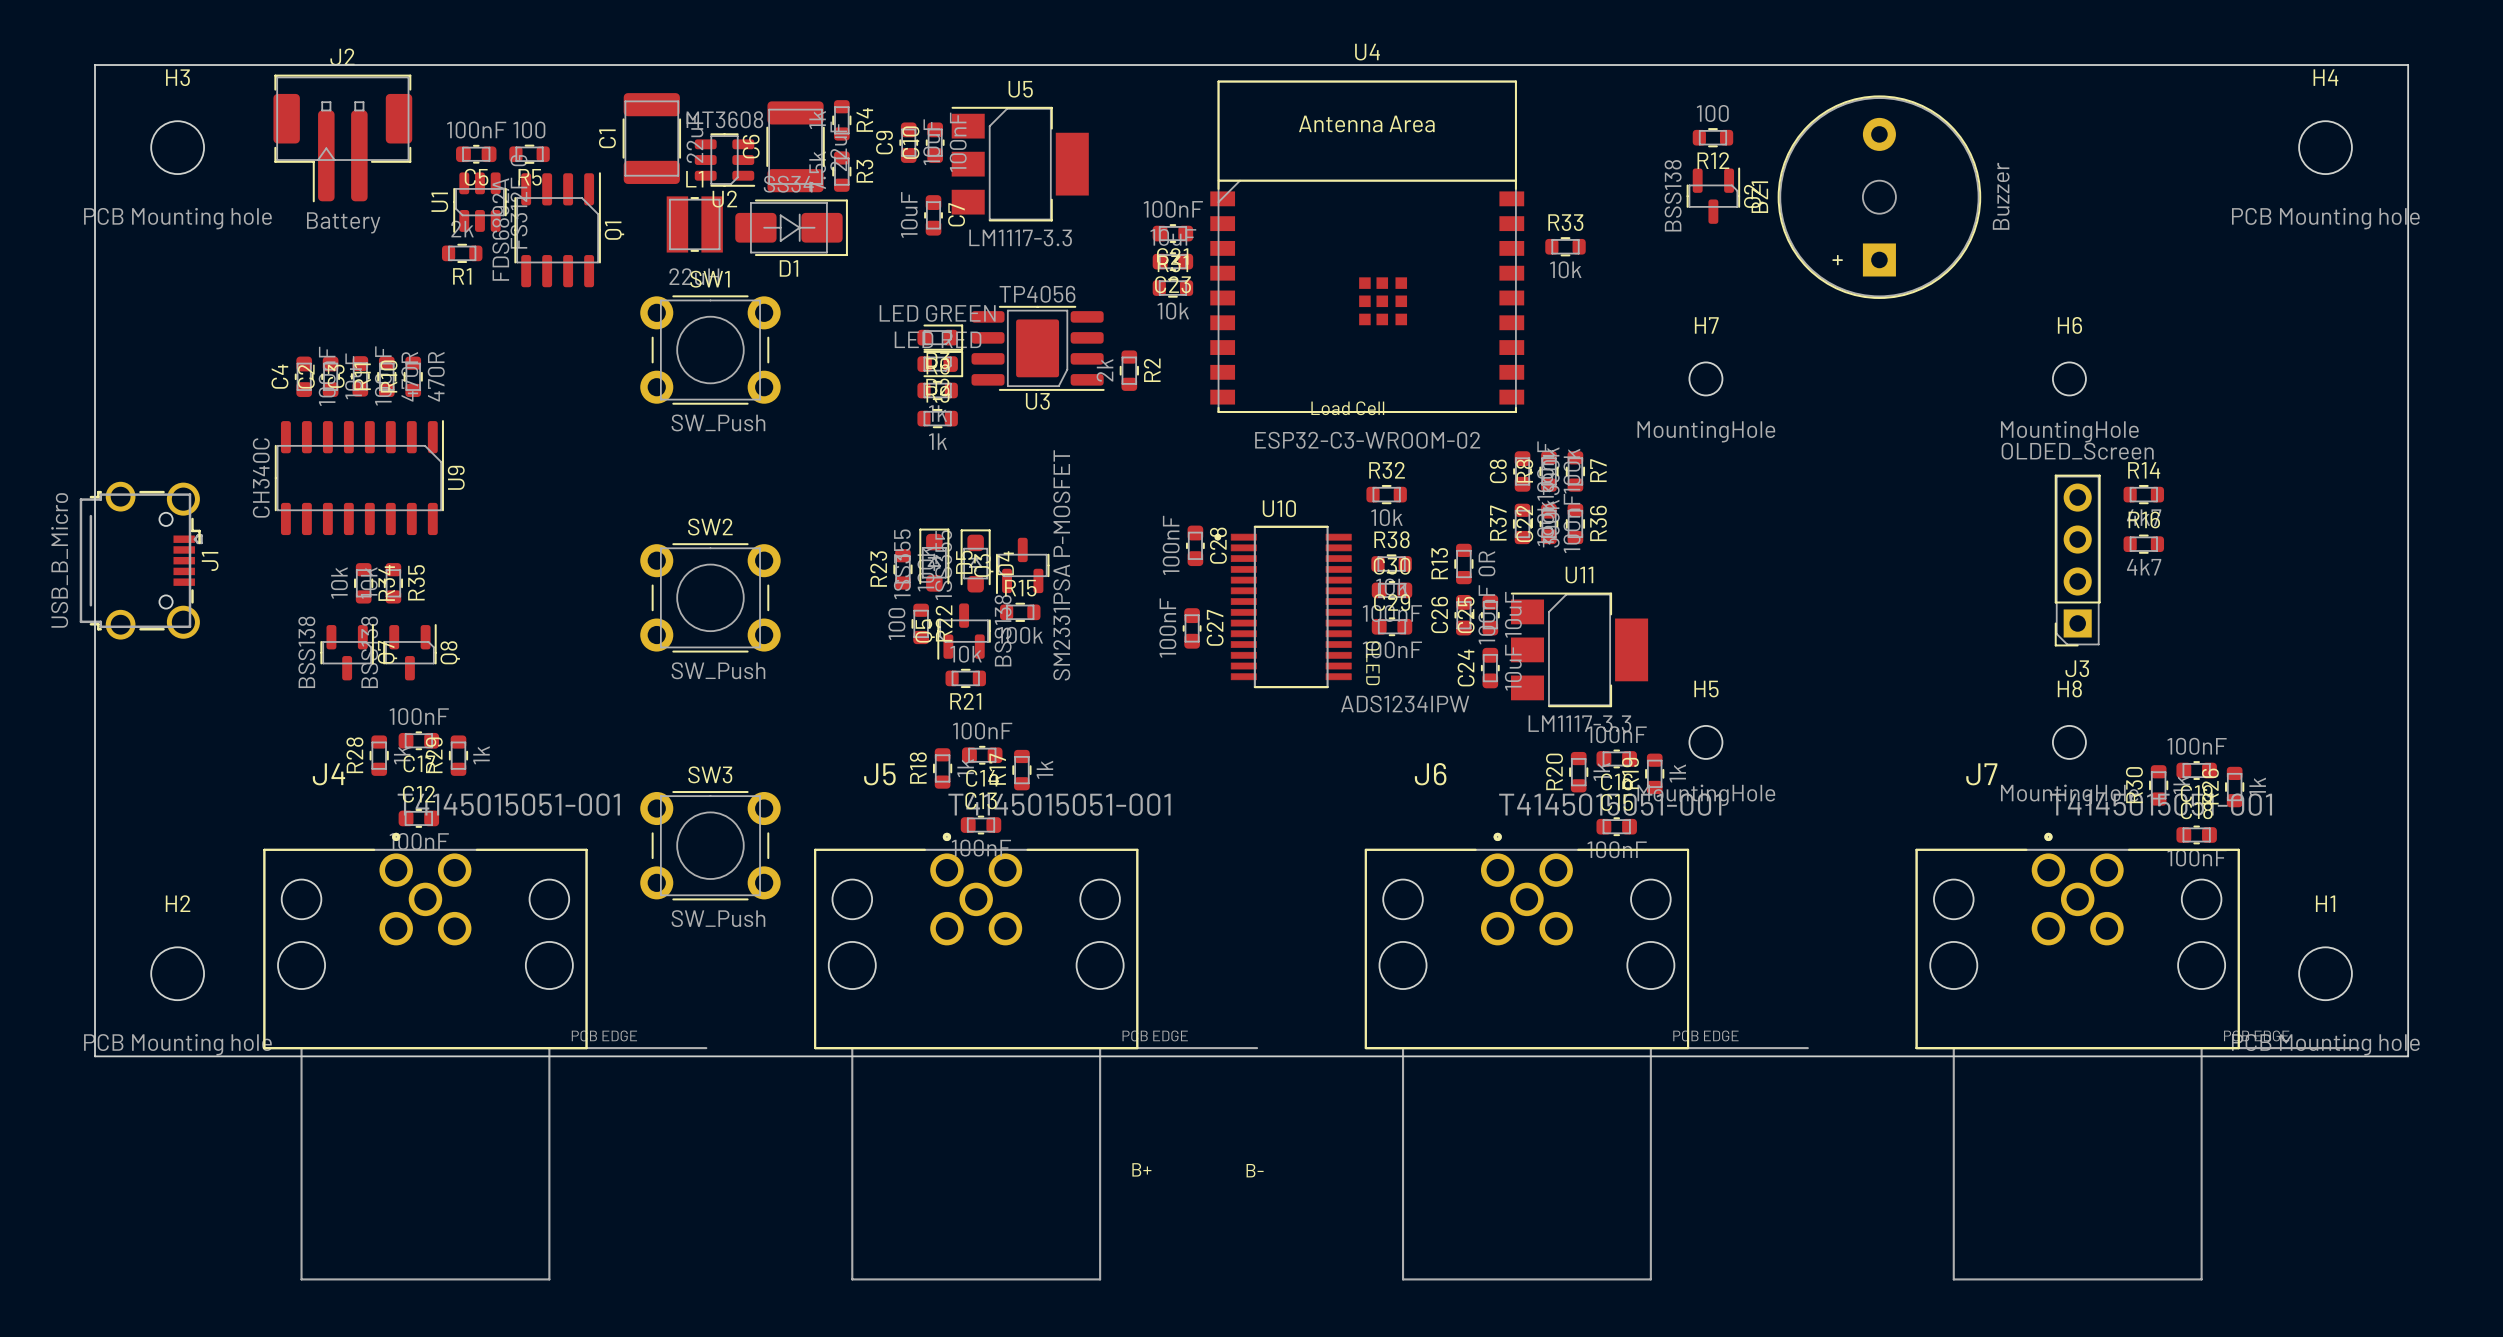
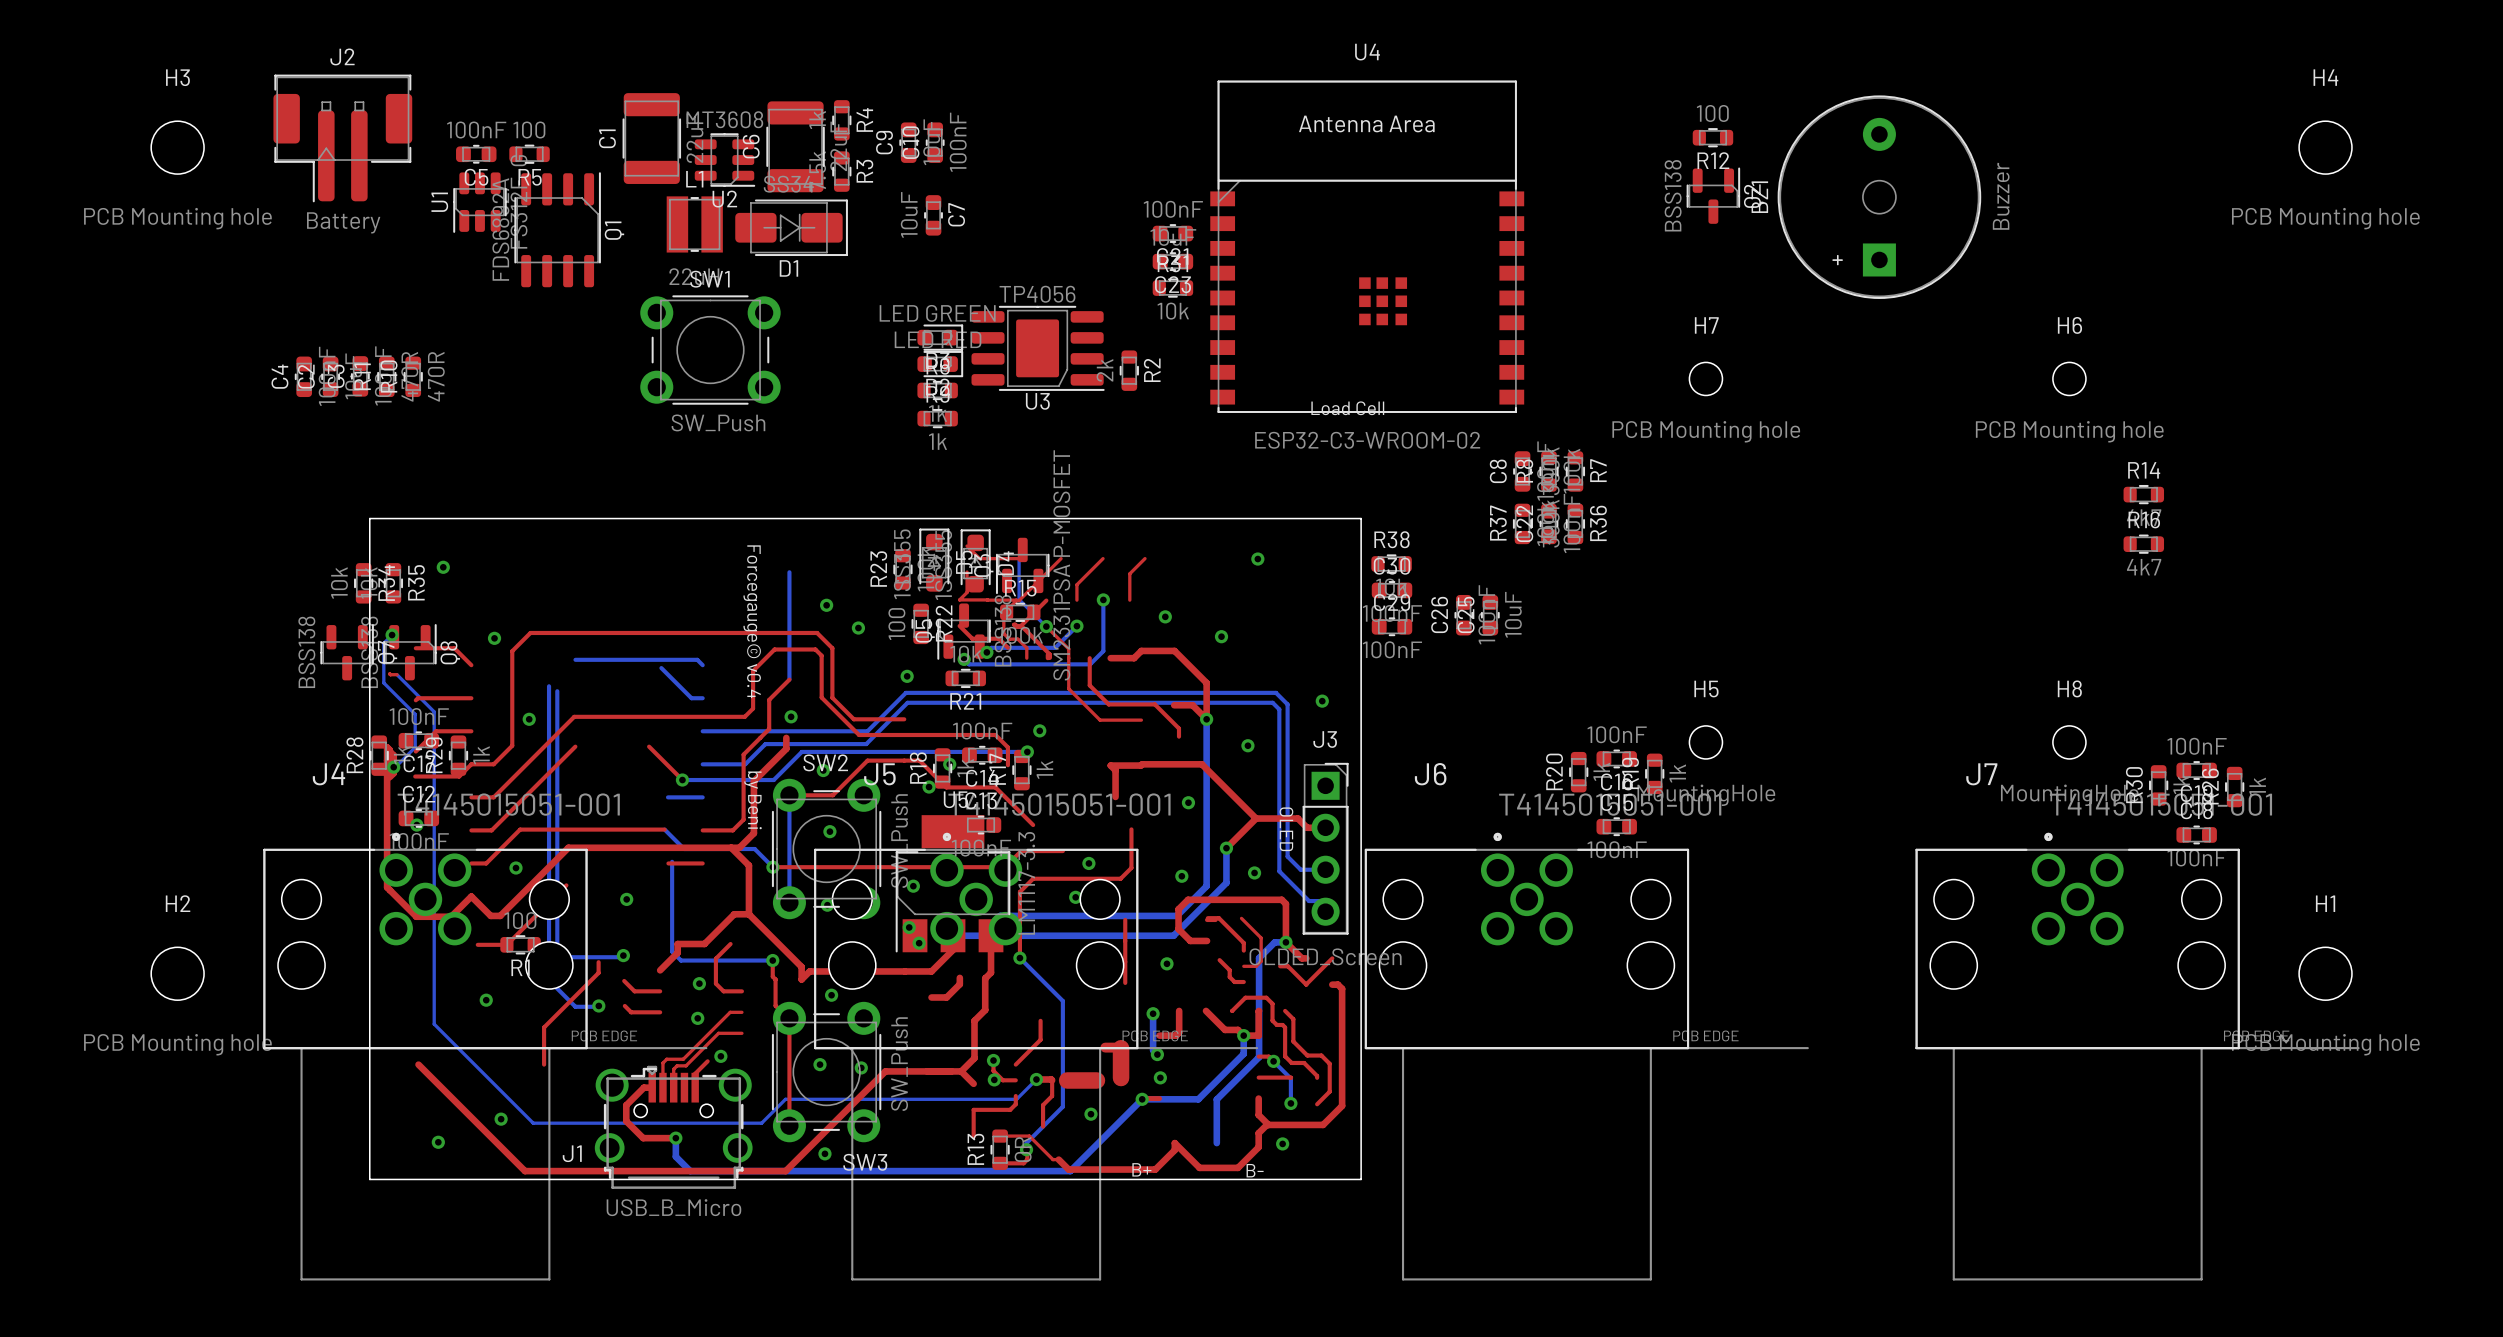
board edge: (95, 65) (2408, 65) (2408, 1056) (95, 1056) (95, 65) -> none
U5 rotation: 0° (1020, 164) -> 90° counterclockwise (953, 883)
U5 position: (1020, 164) -> (953, 883)
R1 value: 2k (462, 229) -> 100 (520, 920)
R33: 10k (1565, 246) -> none
R1 position: (462, 253) -> (520, 944)
H7 value: MountingHole (1706, 431) -> PCB Mounting hole (1706, 431)
H6 value: MountingHole (2069, 431) -> PCB Mounting hole (2069, 431)
U9: CH340C (359, 477) -> none
J1 footprint: [79, 481, 203, 640] -> [594, 1065, 753, 1189]
R32: 10k (1386, 494) -> none
board edge: none -> (369, 518) (369, 1179) (1361, 1179) (1361, 518) (369, 518)
C28: 100nF (1195, 545) -> none
top track: none -> (967, 546) (979, 558) (1019, 558)
bottom track: none -> (1019, 558) (1019, 599) (1046, 626)
top track: none -> (1061, 558) (1019, 600) (1016, 600)
top track: none -> (1103, 558) (1076, 584) (1076, 600)
top track: none -> (1145, 558) (1129, 573) (1129, 600)
via: none -> (1257, 559)
J1 value position: USB_B_Micro (59, 560) -> USB_B_Micro (673, 1207)
J3 rotation: 0° (2077, 560) -> 180° (1325, 848)
J3 position: (2077, 560) -> (1325, 848)
J1 name position: J1 (210, 561) -> J1 (572, 1153)
R13 position: (1463, 563) -> (1000, 1149)
via: none -> (443, 567)
bottom track: none -> (789, 572) (789, 679)
top track: none -> (967, 572) (967, 592) (959, 599) (987, 599)
SW2 rotation: 0° (710, 597) -> 90° counterclockwise (826, 849)
SW2 position: (710, 597) -> (826, 849)
bottom track: none -> (1103, 599) (1103, 651) (1090, 664) (969, 664) (964, 659)
via: none -> (1103, 599)
top track: none -> (987, 600) (1016, 600)
top track: none -> (1016, 600) (1003, 613) (1003, 633) (1009, 639) (1017, 639) (1026, 648) (1026, 658)
top track: none -> (1046, 600) (1020, 626)
via: none -> (826, 605)
U10: ADS1234IPW (1283, 606) -> none
via: none -> (1165, 616)
text: none -> Forcegauge© v0.4 (752, 621)
top track: none -> (959, 625) (972, 638) (998, 638) (1007, 647)
top track: none -> (1016, 625) (1014, 624) (1021, 626) (1049, 654) (1049, 657)
top track: none -> (1046, 626) (1068, 648) (1068, 688) (1100, 720) (1141, 720)
via: none -> (1046, 626)
bottom track: none -> (1076, 626) (1055, 647) (991, 647) (986, 652)
via: none -> (1076, 626)
via: none -> (858, 628)
C27: 100nF (1192, 628) -> none
bottom track: none -> (392, 635) (383, 643) (383, 682) (415, 714) (415, 747) (393, 767)
via: none -> (392, 635)
via: none -> (1221, 636)
via: none -> (494, 638)
top track: none -> (415, 648) (454, 648) (471, 665)
U11: LM1117-3.3 (1579, 649) -> none
via: none -> (986, 652)
top track: none -> (1047, 654) (1047, 658)
top track: none -> (1089, 658) (1089, 685) (1108, 704) (1154, 704) (1179, 728) (1179, 736)
top track: none -> (1110, 658) (1134, 658) (1141, 650) (1174, 650) (1206, 682) (1206, 719) (1192, 705) (1174, 705)
bottom track: none -> (575, 659) (697, 659) (702, 665)
via: none -> (964, 659)
text position: OLED (1372, 663) -> OLED (1286, 829)
bottom track: none -> (661, 668) (691, 698) (702, 698)
C24: 10uF (1490, 668) -> none
top track: none -> (389, 673) (397, 674)
bottom track: none -> (397, 674) (434, 711) (434, 1024) (533, 1123) (761, 1123) (785, 1099) (1016, 1099) (1036, 1079)
via: none -> (907, 676)
top track: none -> (789, 679) (769, 699) (769, 729) (743, 754) (743, 819) (732, 830) (702, 830)
bottom track: none -> (549, 686) (549, 980) (575, 1006) (598, 1005)
bottom track: none -> (557, 691) (557, 947) (567, 957) (621, 957) (623, 955)
top track: none -> (471, 698) (417, 698) (415, 700)
via: none -> (1322, 701)
via: none -> (791, 716)
via: none -> (529, 719)
top track: none -> (904, 719) (853, 719) (832, 697) (832, 648) (817, 632) (530, 632) (512, 651) (512, 745) (493, 764) (471, 764) (459, 776) (415, 776)
bottom track: none -> (1206, 719) (1206, 886) (1176, 915) (1000, 915) (993, 922)
via: none -> (1206, 719)
via: none -> (1039, 730)
top track: none -> (471, 731) (436, 731) (415, 751)
bottom track: none -> (702, 731) (867, 731) (905, 692) (1276, 692) (1287, 704) (1287, 856) (1300, 869) (1325, 869)
top track: none -> (786, 737) (786, 748) (753, 781) (753, 833) (739, 847) (568, 847) (500, 915) (490, 915) (471, 896) (451, 916) (416, 916) (387, 887) (387, 747) (393, 755) (393, 773) (389, 777)
via: none -> (1247, 745)
top track: none -> (575, 746) (491, 830) (471, 830)
top track: none -> (649, 746) (682, 780)
bottom track: none -> (1027, 751) (801, 751) (773, 780) (682, 780)
via: none -> (1027, 751)
bottom track: none -> (702, 764) (745, 764) (765, 744) (866, 744) (907, 702) (1272, 702) (1279, 709) (1279, 871) (1309, 901) (1323, 901)
via: none -> (949, 764)
top track: none -> (1007, 765) (1007, 747) (995, 735) (859, 735) (821, 697) (821, 655) (815, 649) (774, 649) (753, 670) (753, 708) (744, 716) (574, 716) (493, 797) (471, 797)
via: none -> (393, 767)
via: none -> (823, 770)
SW3 name position: SW3 (710, 774) -> SW3 (865, 1162)
via: none -> (682, 780)
via: none -> (929, 787)
top track: none -> (789, 795) (832, 795) (867, 760) (919, 760) (946, 787) (995, 787) (1033, 825)
bottom track: none -> (789, 795) (789, 902)
top track: none -> (1115, 796) (1115, 770) (1110, 765) (1201, 764) (1256, 818)
bottom track: none -> (668, 797) (702, 797)
text: none -> by Beni (753, 800)
via: none -> (1188, 802)
top track: none -> (1256, 818) (1225, 848)
top track: none -> (1256, 818) (1297, 818) (1307, 827) (1325, 827)
via: none -> (416, 825)
top track: none -> (664, 829) (520, 829) (486, 863) (471, 863)
bottom track: none -> (664, 829) (684, 849) (754, 849) (772, 867)
top track: none -> (1131, 829) (1131, 867) (1120, 878) (1033, 878) (1019, 891) (1019, 958)
via: none -> (829, 831)
SW3 rotation: 0° (710, 845) -> 90° counterclockwise (826, 1072)
SW3 position: (710, 845) -> (826, 1072)
top track: none -> (731, 847) (748, 865) (748, 914)
bottom track: none -> (1226, 848) (1226, 882) (1173, 935) (953, 935)
via: none -> (1226, 848)
top track: none -> (1062, 851) (1021, 851) (1005, 867) (772, 867)
bottom track: none -> (672, 861) (672, 951) (681, 960) (772, 960)
top track: none -> (668, 863) (702, 863)
via: none -> (1088, 863)
via: none -> (772, 867)
via: none -> (515, 868)
via: none -> (1254, 872)
via: none -> (1181, 876)
top track: none -> (566, 885) (506, 944) (477, 944)
via: none -> (913, 886)
via: none -> (1075, 897)
via: none -> (626, 899)
via: none -> (827, 905)
top track: none -> (748, 914) (734, 914) (704, 944) (677, 944) (677, 952) (660, 970)
top track: none -> (748, 914) (801, 966) (801, 979) (809, 971) (931, 971) (953, 950) (953, 935)
top track: none -> (1207, 918) (1218, 918) (1243, 943) (1243, 950)
top track: none -> (1241, 918) (1261, 938) (1261, 961) (1256, 966) (1243, 966)
top track: none -> (1125, 919) (1125, 982)
top track: none -> (1207, 919) (1215, 919)
via: none -> (909, 927)
top track: none -> (991, 935) (991, 972) (985, 978) (985, 1010) (974, 1020)
top track: none -> (1207, 940) (1190, 940) (1178, 929) (1178, 909) (1188, 899) (1281, 899) (1285, 903) (1285, 942) (1301, 958) (1306, 958)
bottom track: none -> (1285, 942) (1274, 942) (1259, 958) (1259, 1057) (1216, 1099) (1216, 1143)
via: none -> (1285, 942)
via: none -> (919, 943)
top track: none -> (730, 944) (715, 958) (715, 983) (723, 991) (741, 991)
via: none -> (623, 955)
bottom track: none -> (1019, 958) (1062, 1001) (1062, 1106) (1026, 1143) (1026, 1149)
via: none -> (1019, 958)
top track: none -> (1332, 958) (1306, 984)
top track: none -> (772, 960) (772, 976) (775, 979) (775, 1005) (789, 1018) (789, 1125)
via: none -> (772, 960)
top track: none -> (1219, 960) (1229, 970) (1229, 977) (1234, 982) (1243, 982)
top track: none -> (598, 962) (598, 972) (544, 1027) (544, 1064)
via: none -> (1166, 963)
top track: none -> (1280, 966) (1287, 966) (1306, 984)
top track: none -> (959, 977) (959, 984) (946, 997) (931, 997)
top track: none -> (624, 980) (634, 991) (660, 991)
via: none -> (699, 983)
top track: none -> (1332, 984) (1337, 984) (1342, 988) (1342, 1105) (1323, 1124) (1266, 1124) (1258, 1133) (1258, 1147) (1238, 1167) (1199, 1167) (1174, 1143) (1174, 1150) (1155, 1169) (1068, 1169) (1058, 1159) (1052, 1159) (1029, 1136) (1000, 1136)
via: none -> (831, 995)
via: none -> (486, 1000)
via: none -> (598, 1005)
top track: none -> (624, 1005) (631, 1012) (660, 1012)
top track: none -> (1179, 1010) (1179, 1032) (1176, 1035) (1159, 1035)
top track: none -> (1206, 1010) (1225, 1029) (1238, 1029) (1243, 1035) (1258, 1035) (1259, 1010)
top track: none -> (1232, 1010) (1245, 997) (1266, 997) (1272, 1003) (1272, 1020) (1276, 1024) (1282, 1024) (1285, 1027) (1285, 1056) (1291, 1062) (1304, 1062) (1317, 1077)
top track: none -> (1285, 1010) (1293, 1019) (1293, 1041) (1307, 1055) (1321, 1055) (1329, 1063) (1329, 1091) (1317, 1104)
top track: none -> (741, 1012) (730, 1012) (683, 1059) (666, 1059) (662, 1063) (662, 1087)
bottom track: none -> (1153, 1013) (1153, 1050) (1157, 1054)
via: none -> (1153, 1013)
via: none -> (697, 1018)
top track: none -> (974, 1020) (974, 1058) (961, 1071)
top track: none -> (1040, 1020) (1040, 1039) (1015, 1064)
top track: none -> (741, 1033) (718, 1033) (686, 1065) (677, 1065) (673, 1069) (673, 1087)
bottom track: none -> (1243, 1035) (1243, 1053) (1198, 1099) (1142, 1099) (1070, 1171) (690, 1171) (675, 1156) (675, 1138)
via: none -> (1243, 1035)
top track: none -> (1105, 1047) (1120, 1047)
top track: none -> (1121, 1048) (1121, 1078)
via: none -> (1157, 1054)
via: none -> (720, 1056)
top track: none -> (1258, 1056) (1268, 1056) (1273, 1061)
top track: none -> (993, 1060) (993, 1070) (1002, 1080) (1015, 1080)
via: none -> (993, 1060)
top track: none -> (707, 1061) (695, 1073) (695, 1086)
bottom track: none -> (1273, 1061) (1290, 1078) (1290, 1103)
via: none -> (1273, 1061)
top track: none -> (418, 1064) (524, 1171) (785, 1171) (885, 1071) (961, 1071)
via: none -> (820, 1064)
via: none -> (861, 1067)
top track: none -> (961, 1071) (973, 1083)
via: none -> (1160, 1077)
top track: none -> (1258, 1077) (1291, 1077)
via: none -> (994, 1079)
top track: none -> (1036, 1079) (1052, 1080) (1052, 1096) (1043, 1105) (1043, 1126)
via: none -> (1036, 1079)
top track: none -> (1067, 1080) (1096, 1080)
top track: none -> (652, 1087) (643, 1087) (626, 1105) (626, 1121) (643, 1138) (675, 1138)
top track: none -> (1015, 1096) (1015, 1104) (1010, 1109) (973, 1109) (973, 1136)
top track: none -> (1159, 1098) (1142, 1099)
top track: none -> (1258, 1098) (1258, 1115) (1268, 1124)
via: none -> (1142, 1099)
via: none -> (1290, 1103)
via: none -> (1090, 1114)
via: none -> (501, 1119)
via: none -> (675, 1138)
via: none -> (438, 1142)
via: none -> (1282, 1143)
top track: none -> (1026, 1149) (1027, 1159) (1023, 1163) (1000, 1163)
via: none -> (1026, 1149)
via: none -> (824, 1153)

